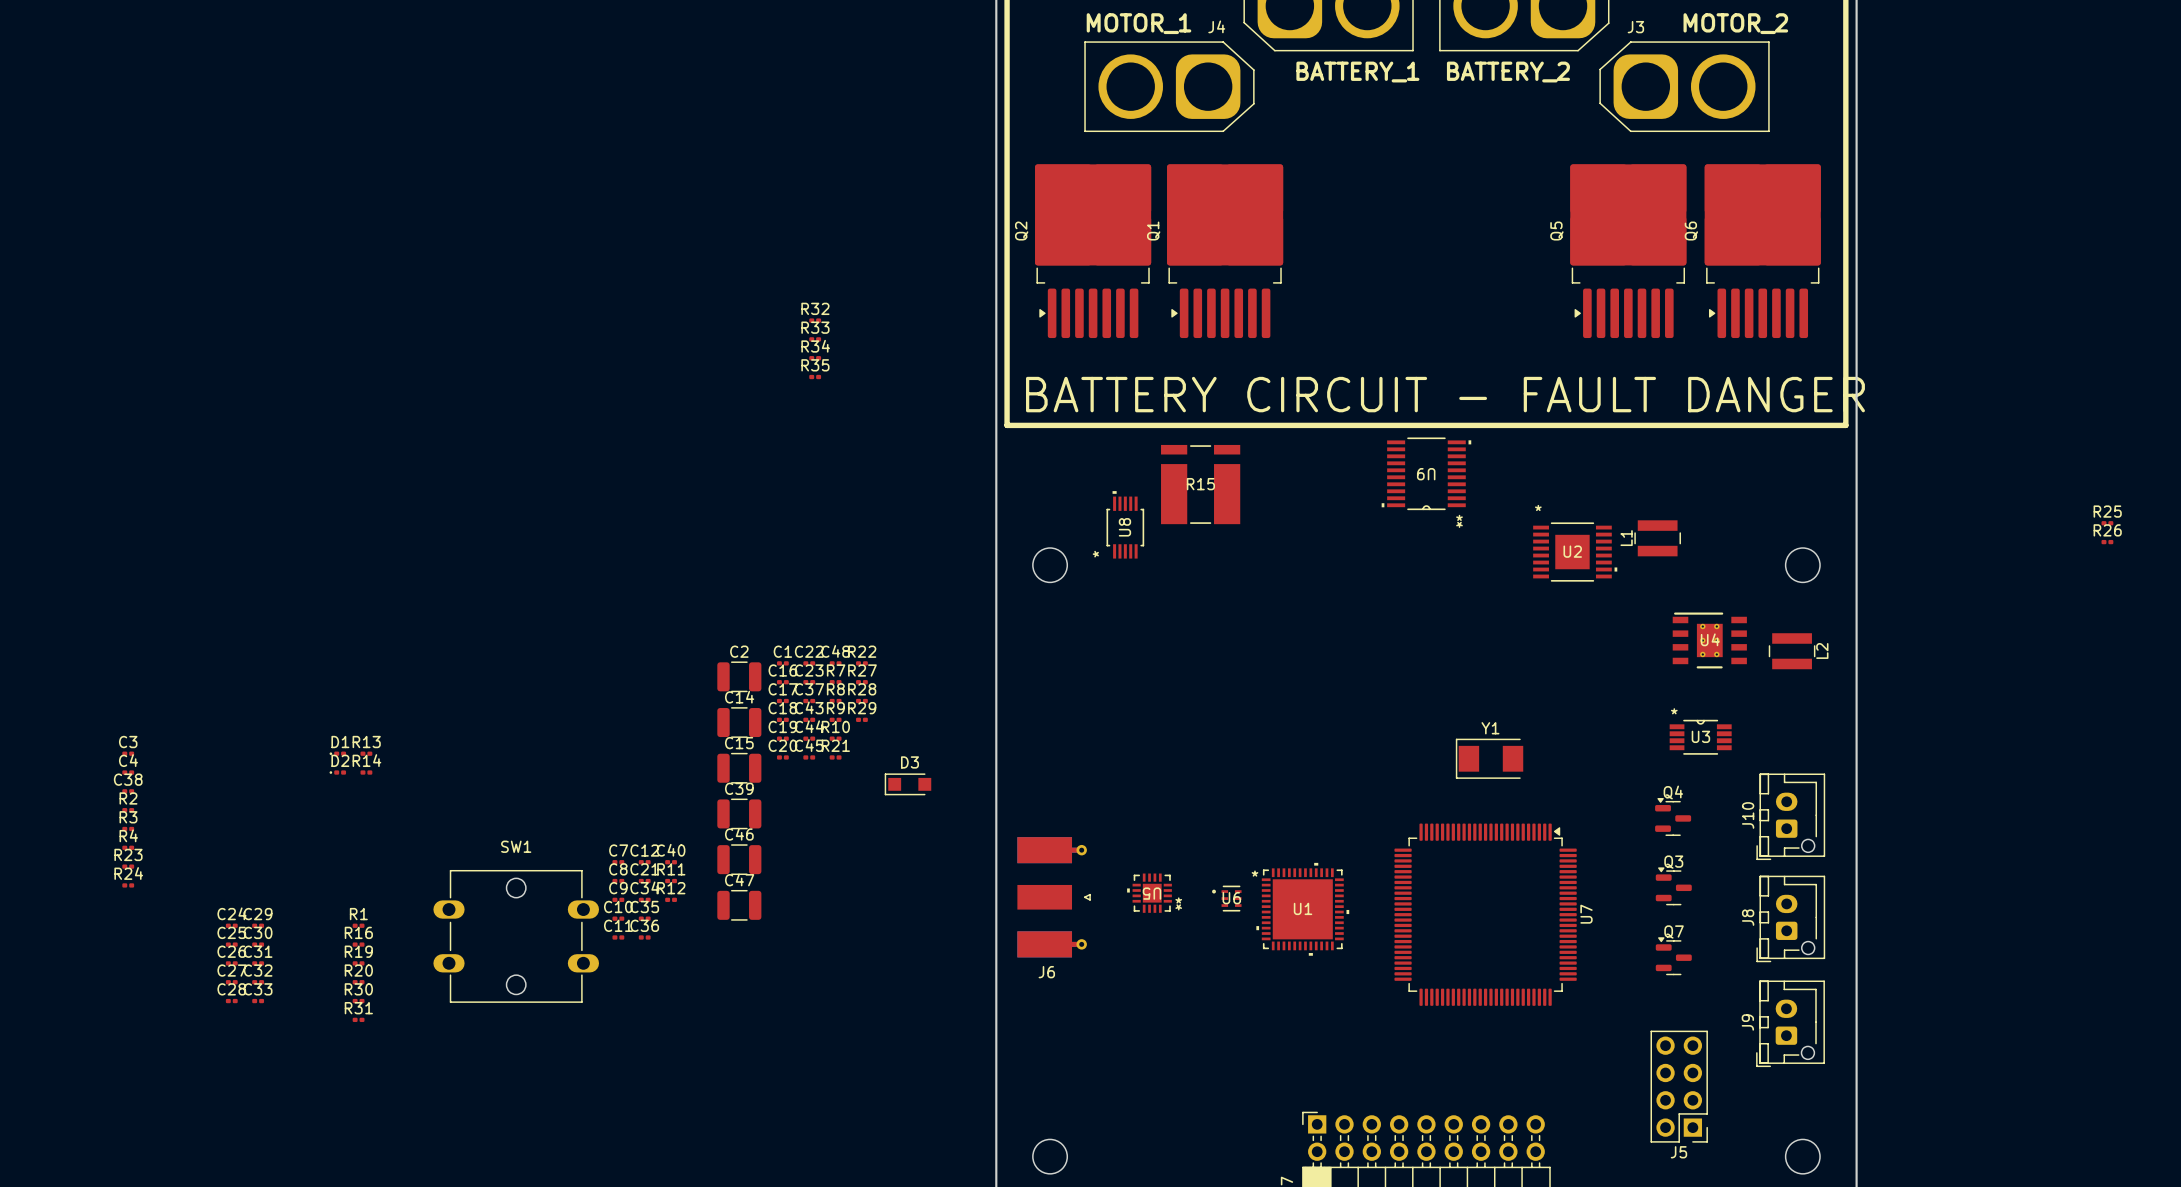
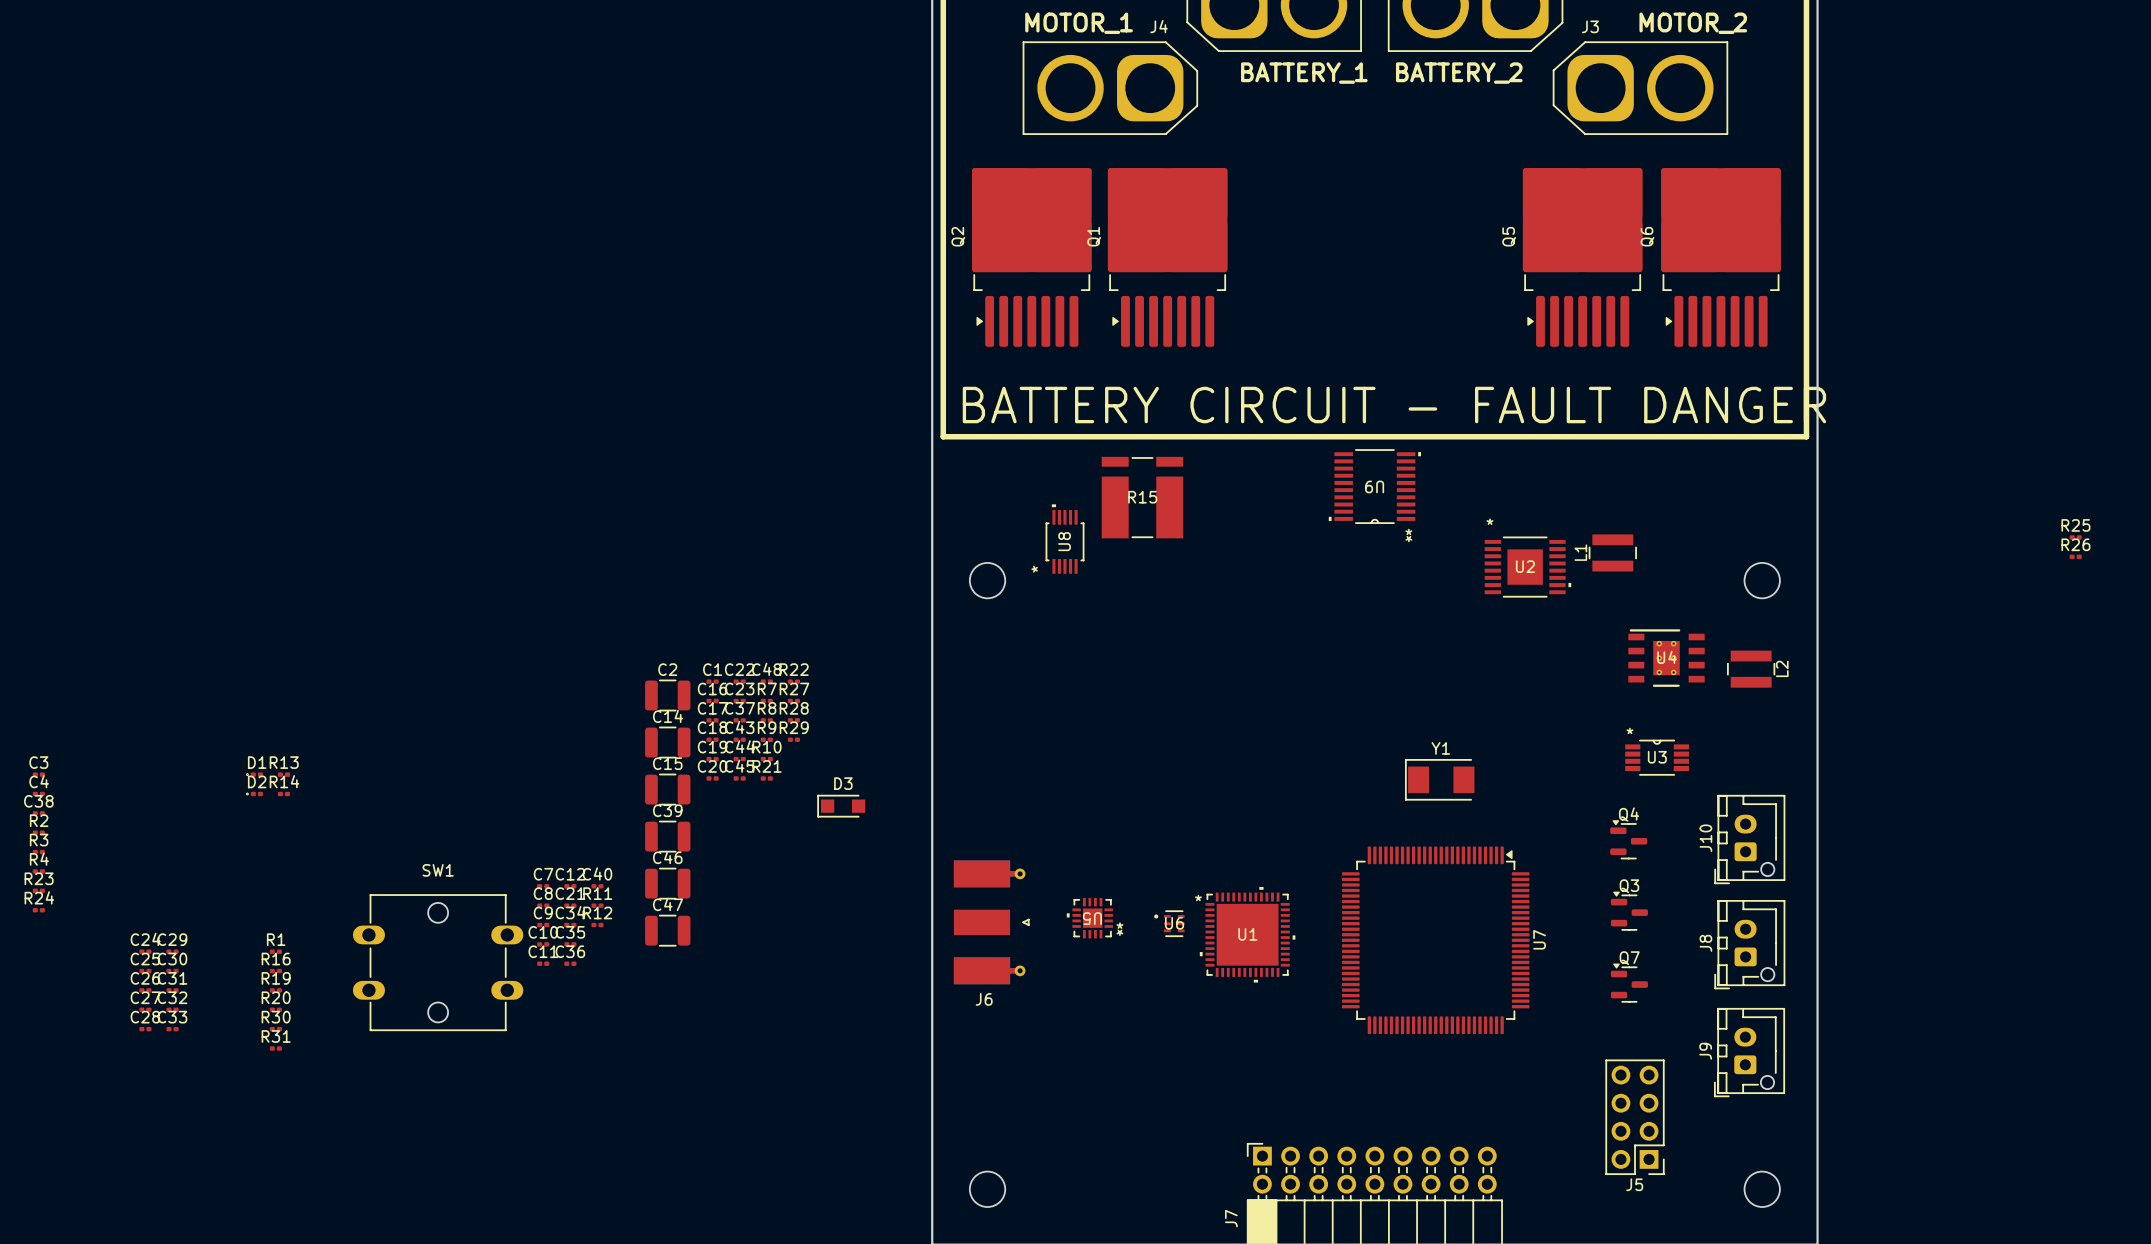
R32: (815, 320) -> none
R33: (815, 339) -> none
R34: (815, 358) -> none
R35: (815, 377) -> none

